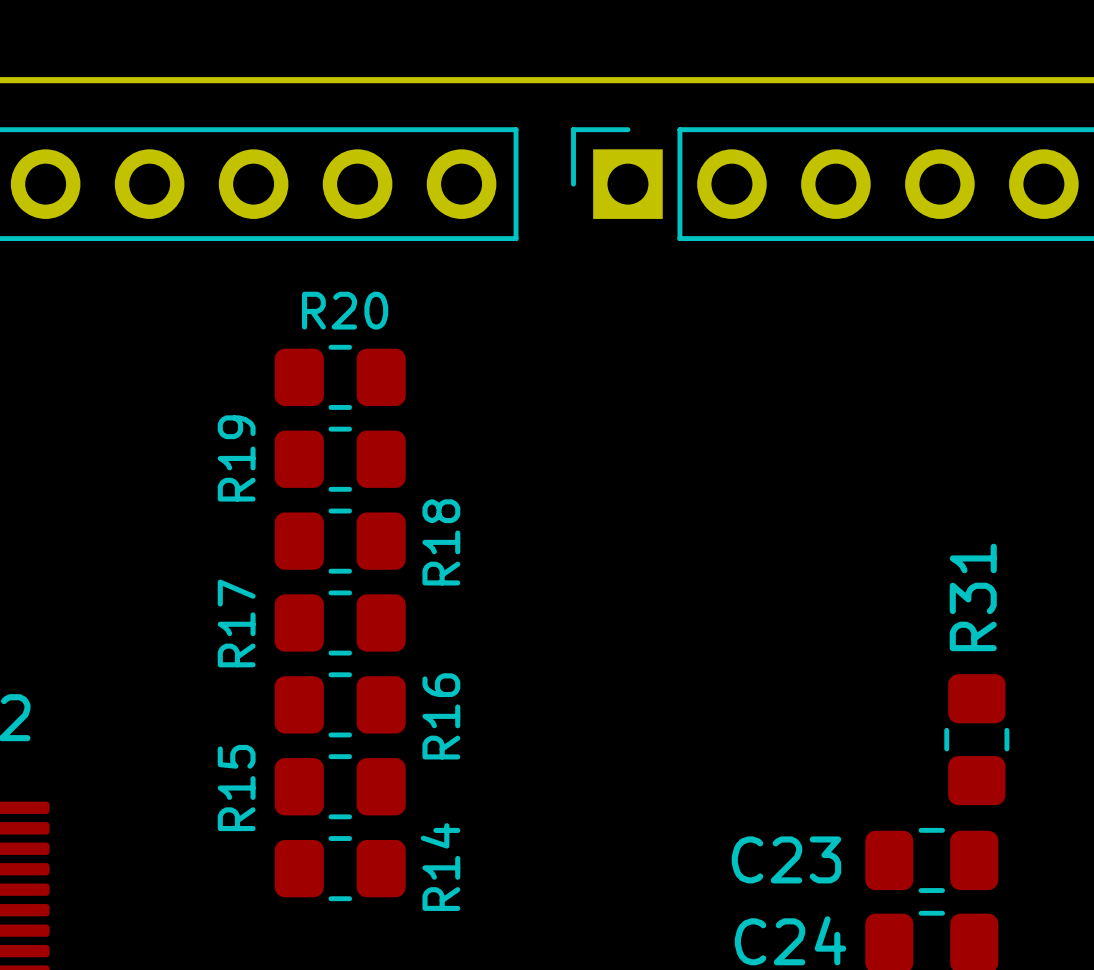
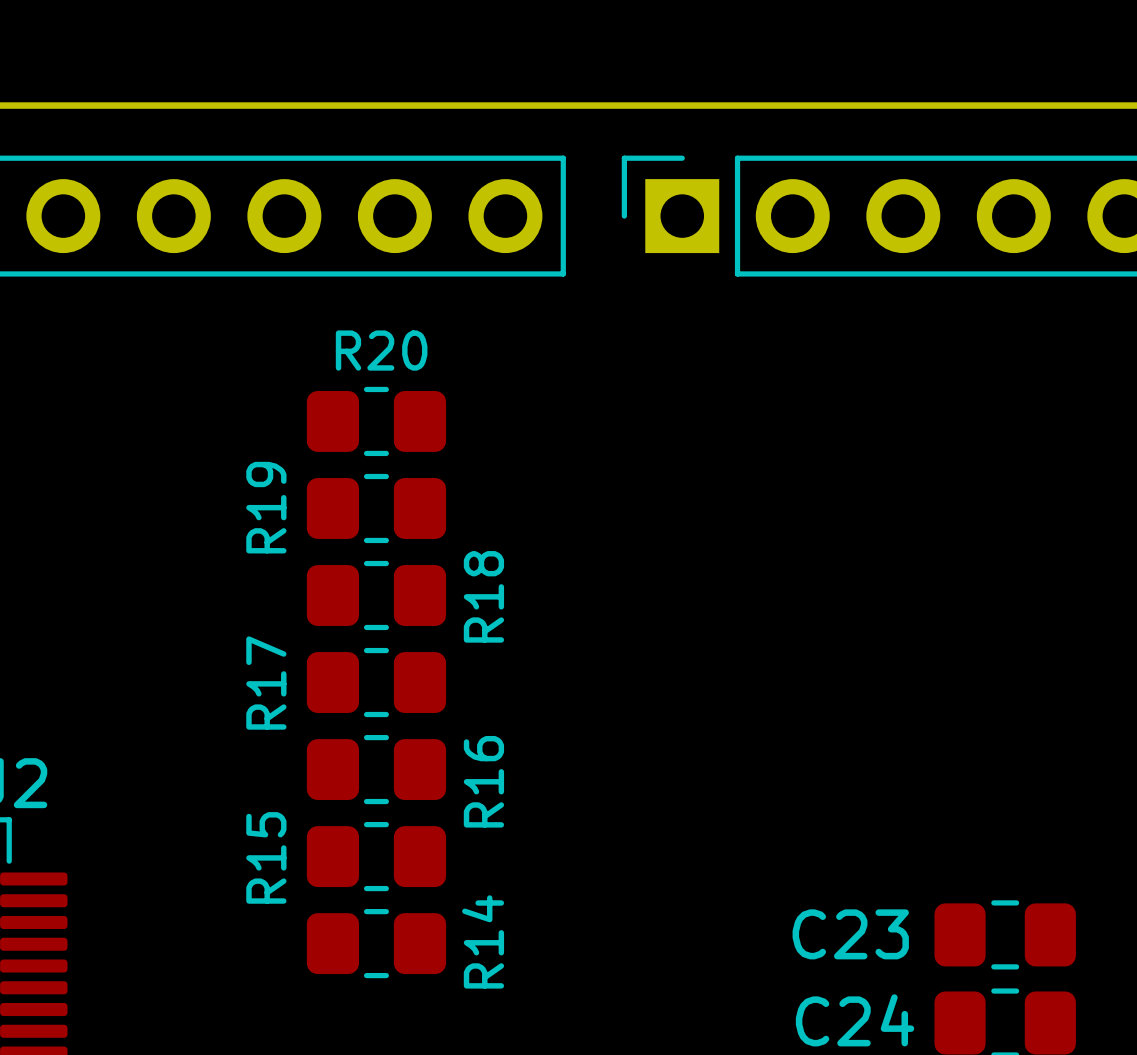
R31: (976, 739) -> none

